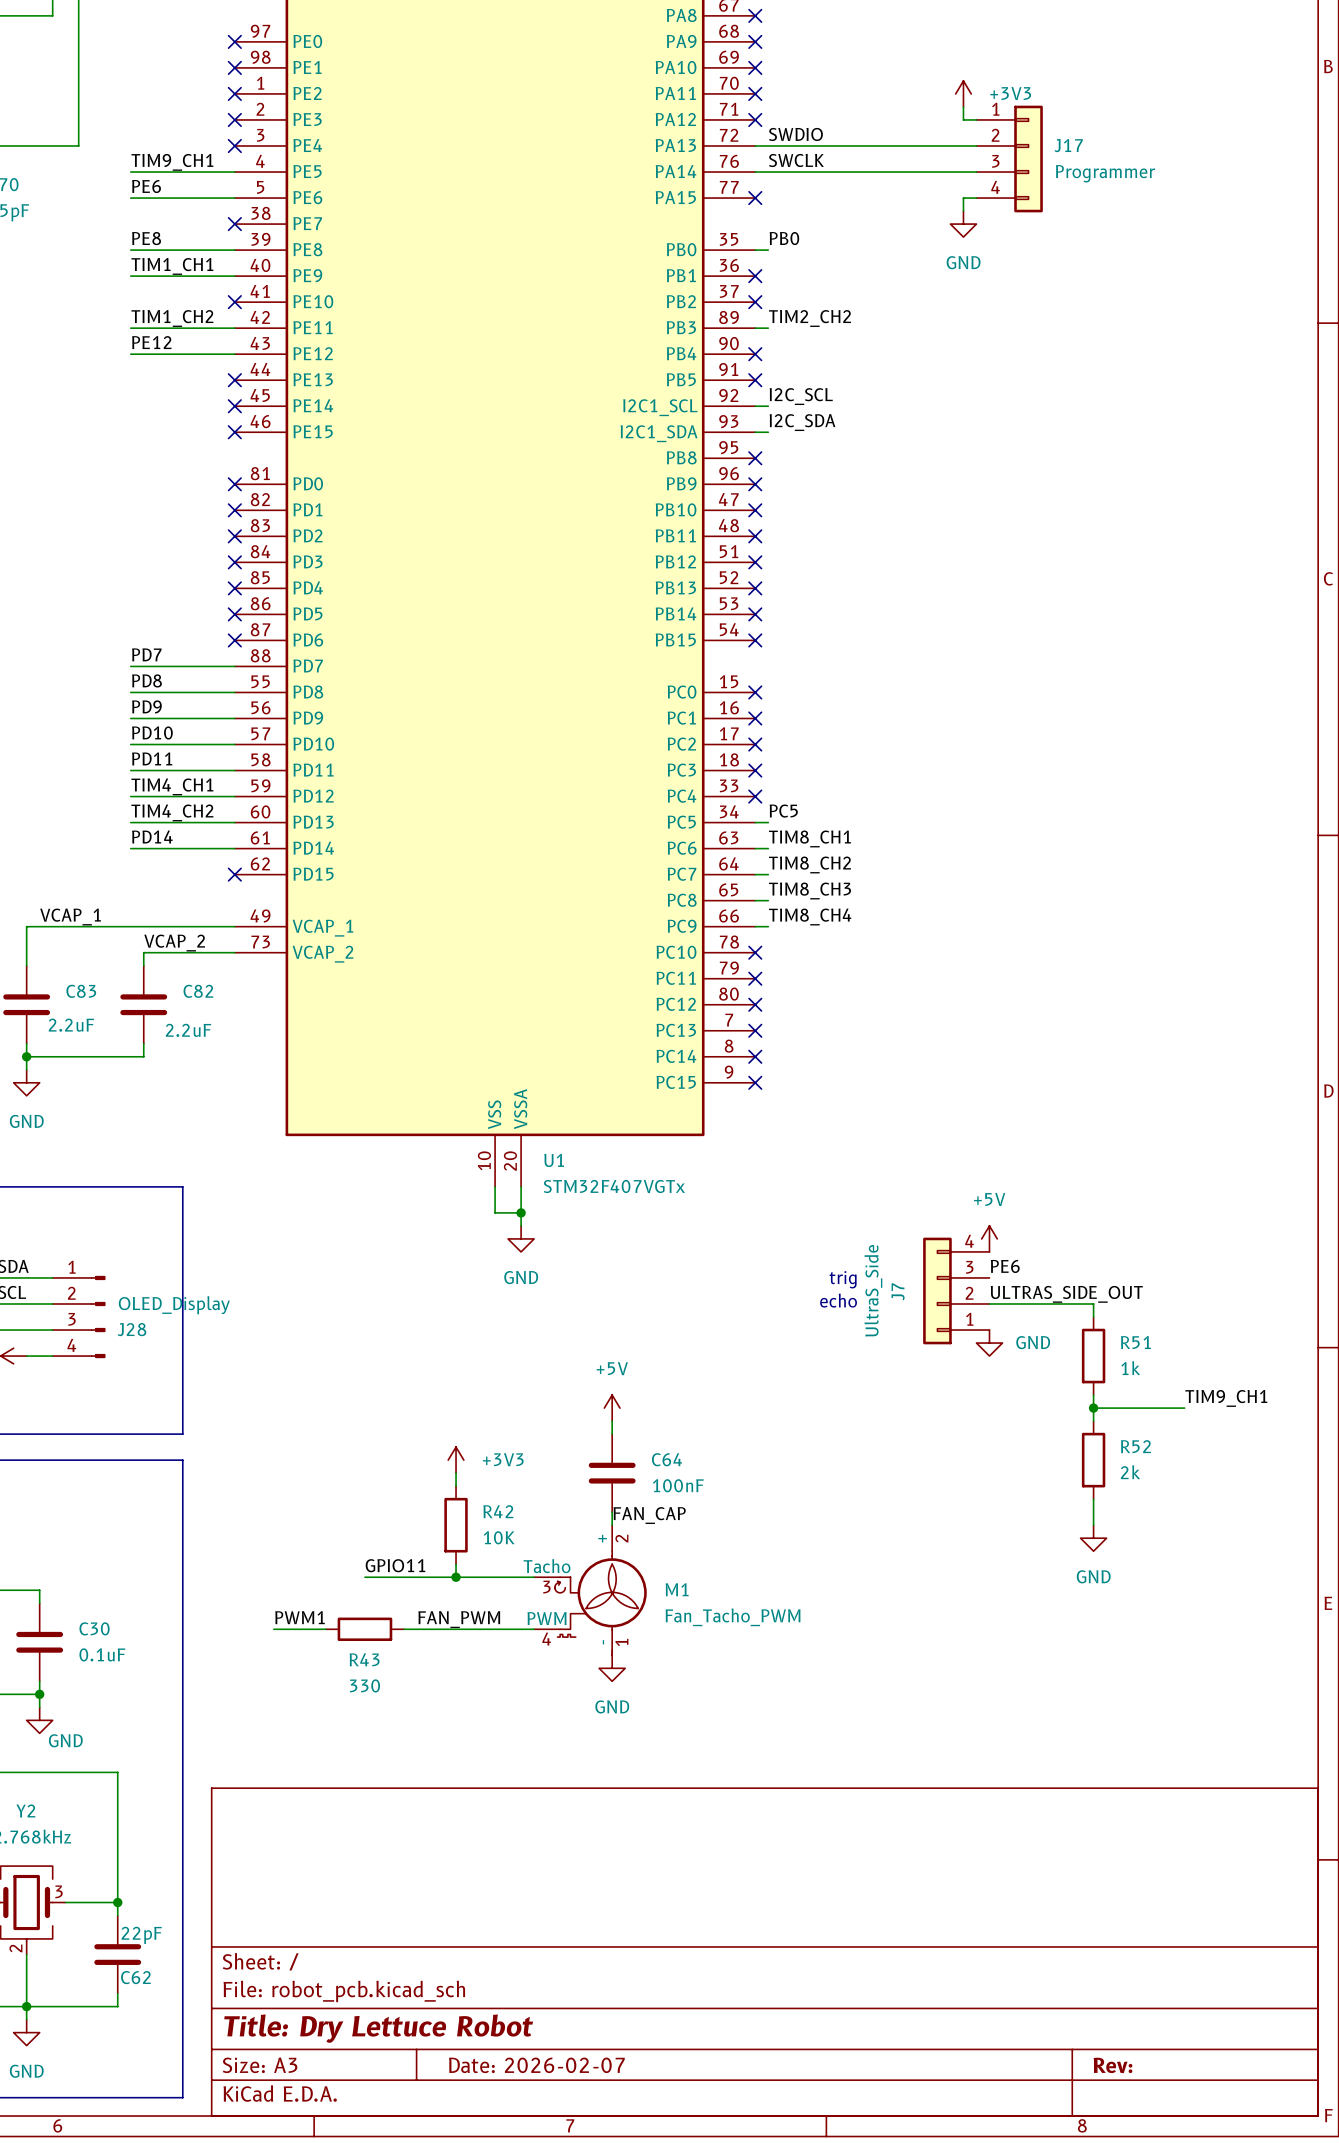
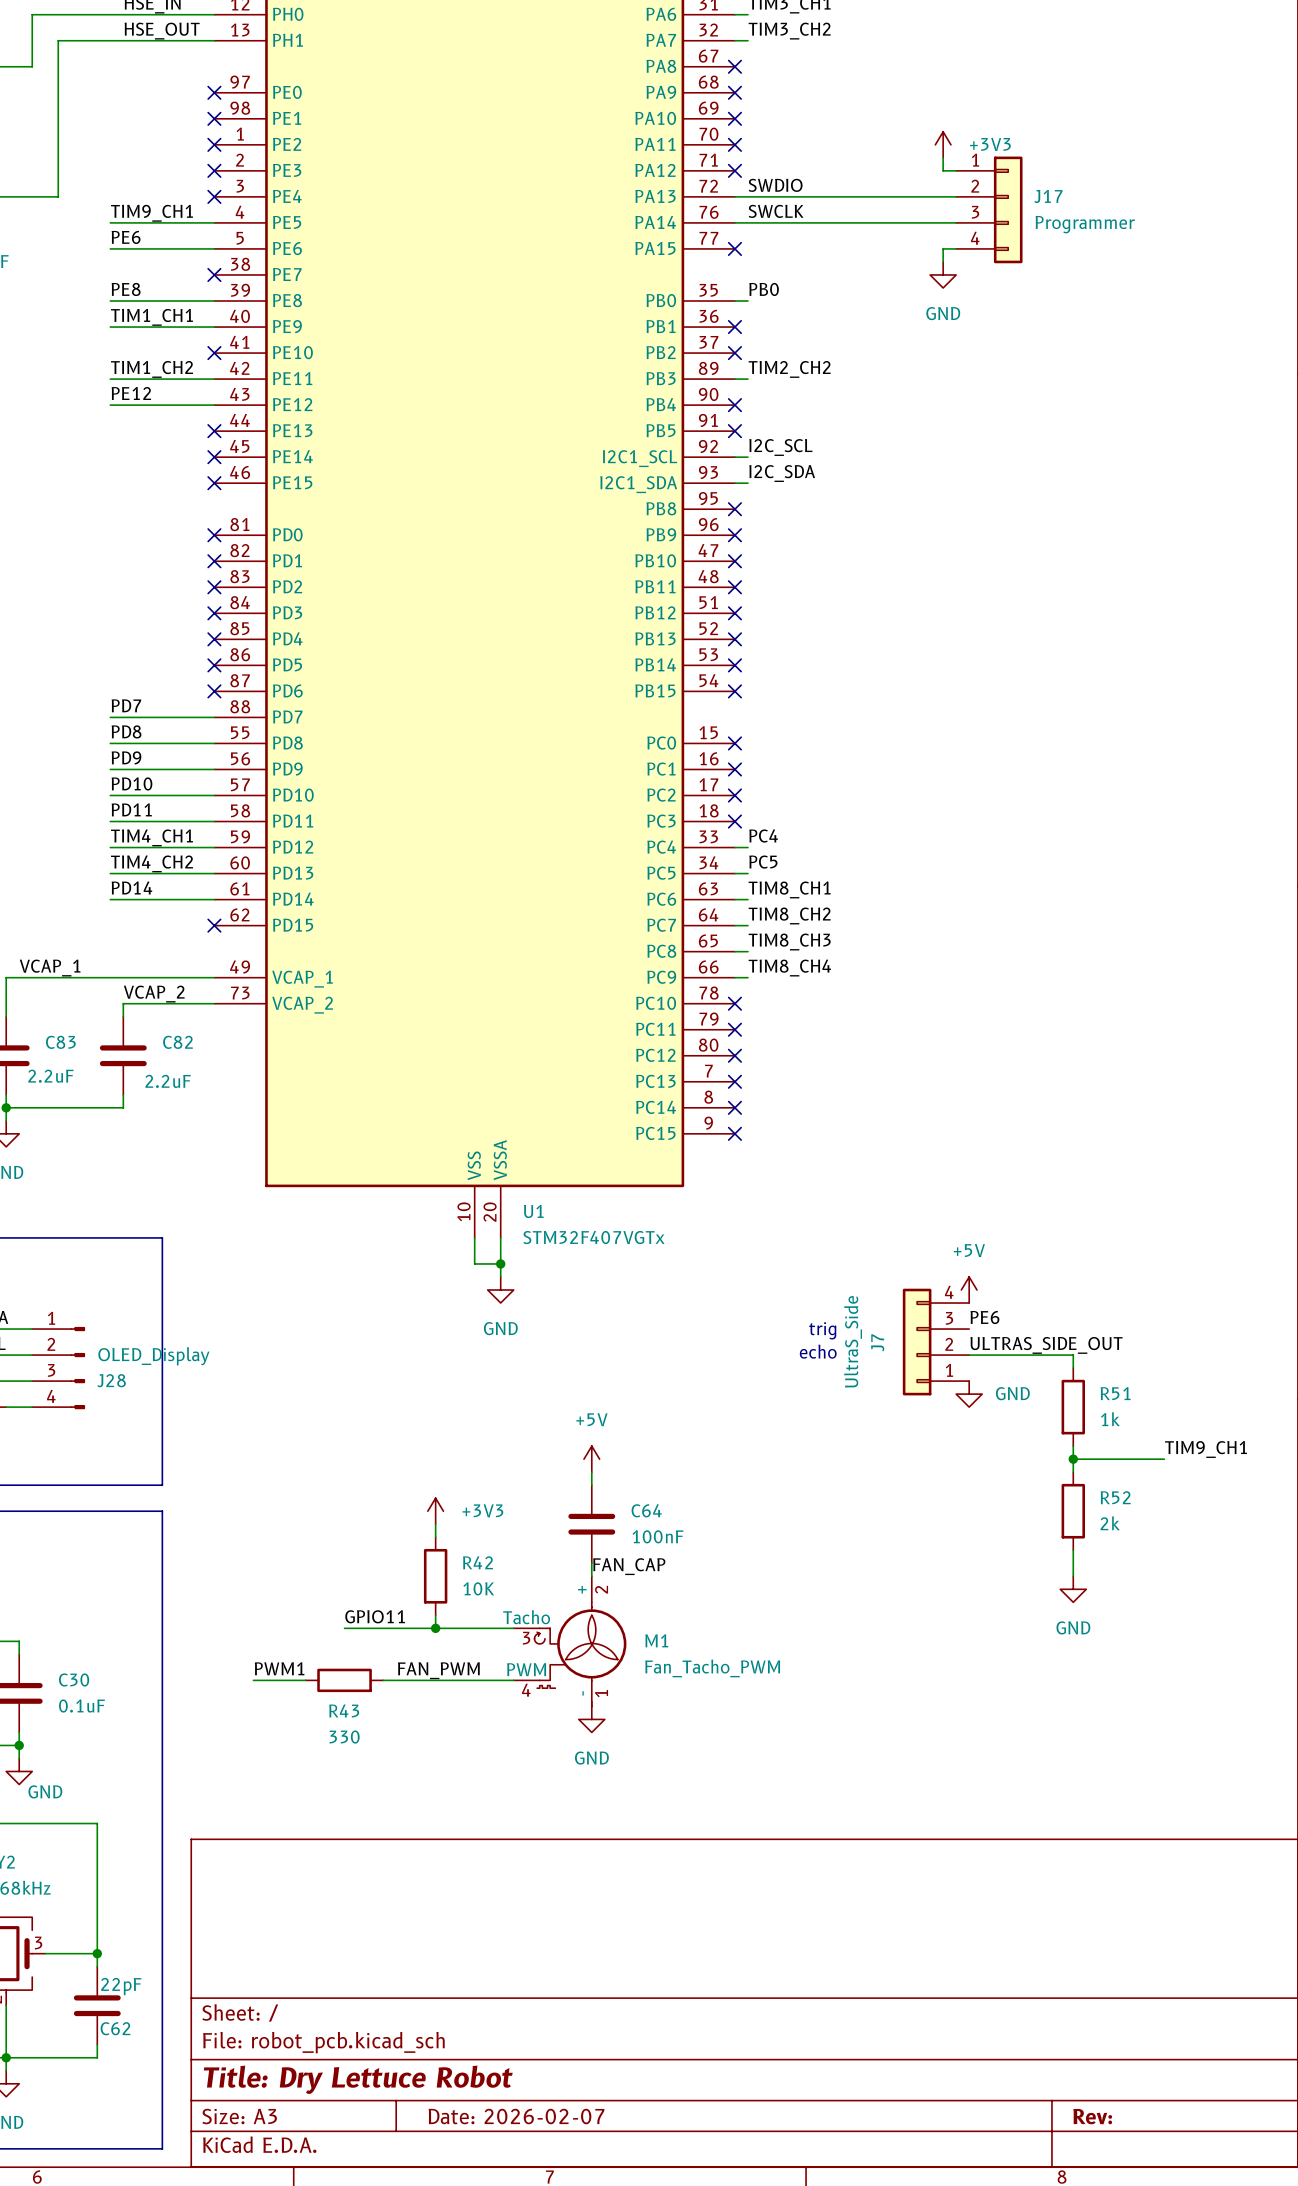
label: none -> PC4 (763, 836)
wire: none -> (734, 847) (747, 847)
no-connect mark: (755, 796) -> none

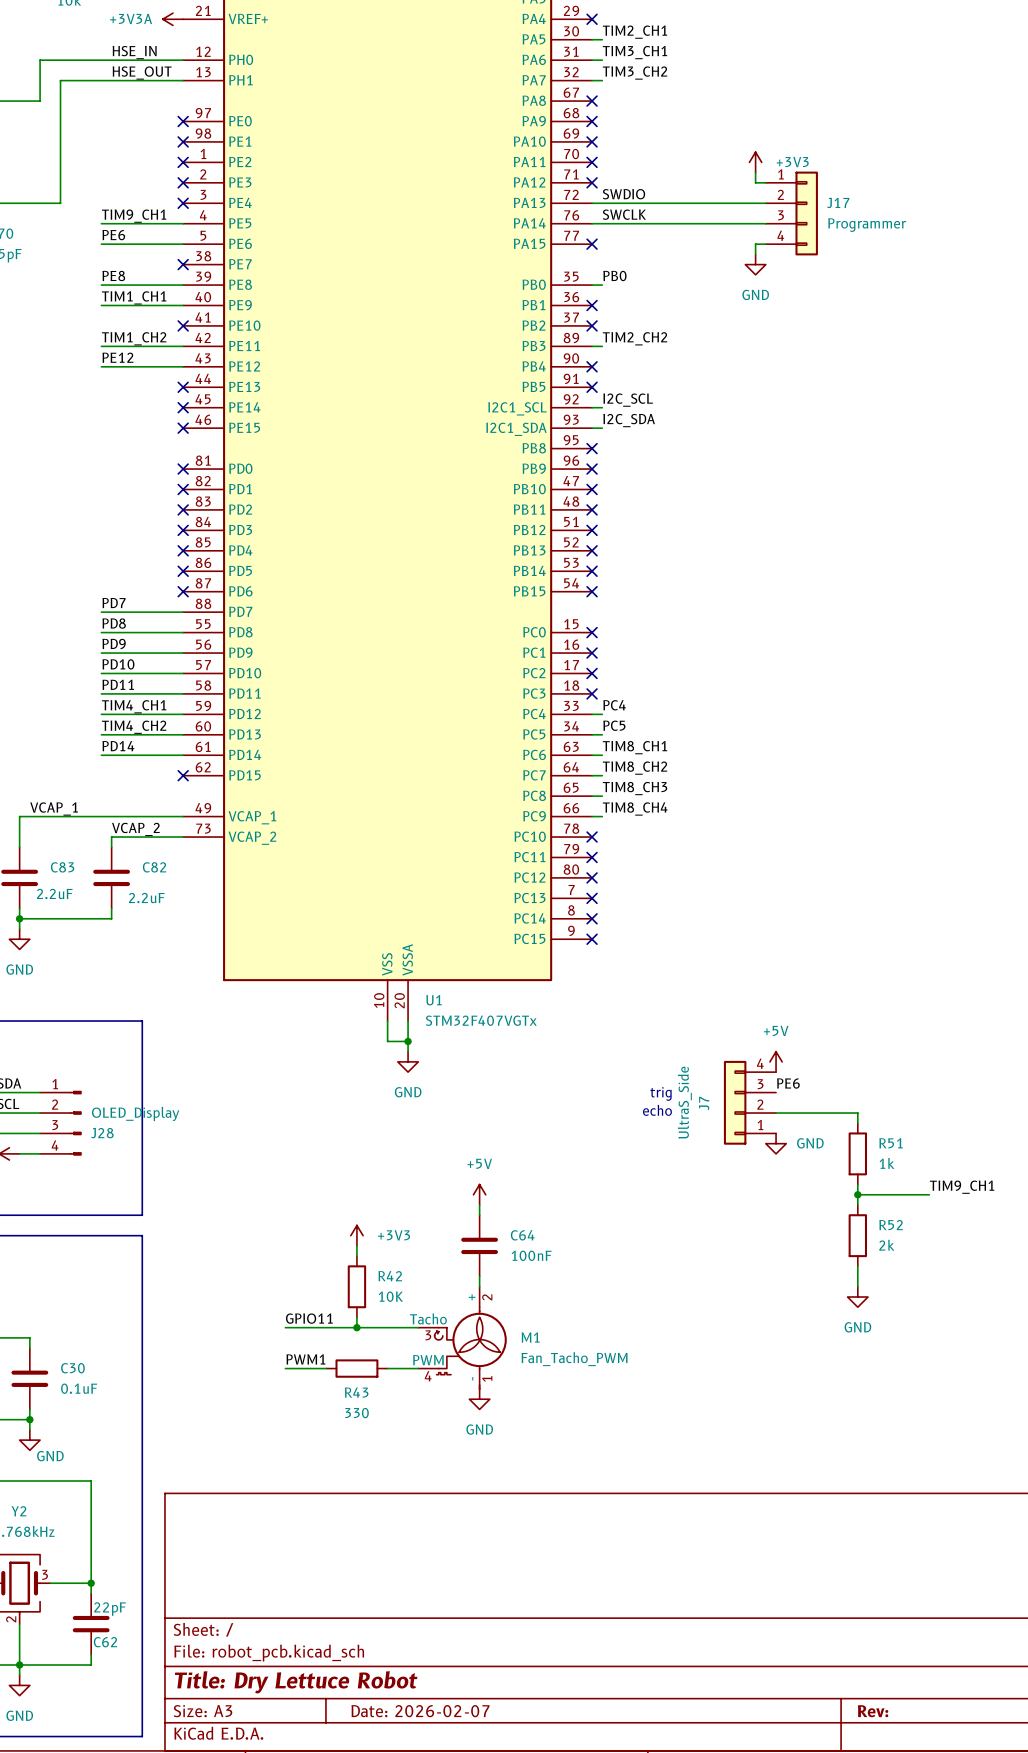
label: ULTRAS_SIDE_OUT (1046, 1345) -> none
label: FAN_CAP (629, 1566) -> none
label position: PWM1 (279, 1668) -> PWM1 (305, 1359)
label: FAN_PWM (438, 1670) -> none
wire: (253, 1680) (305, 1680) -> none
wire: none -> (285, 1368) (316, 1368)
R43 position: (344, 1680) -> (356, 1368)
wire: (396, 1680) (474, 1680) -> none

